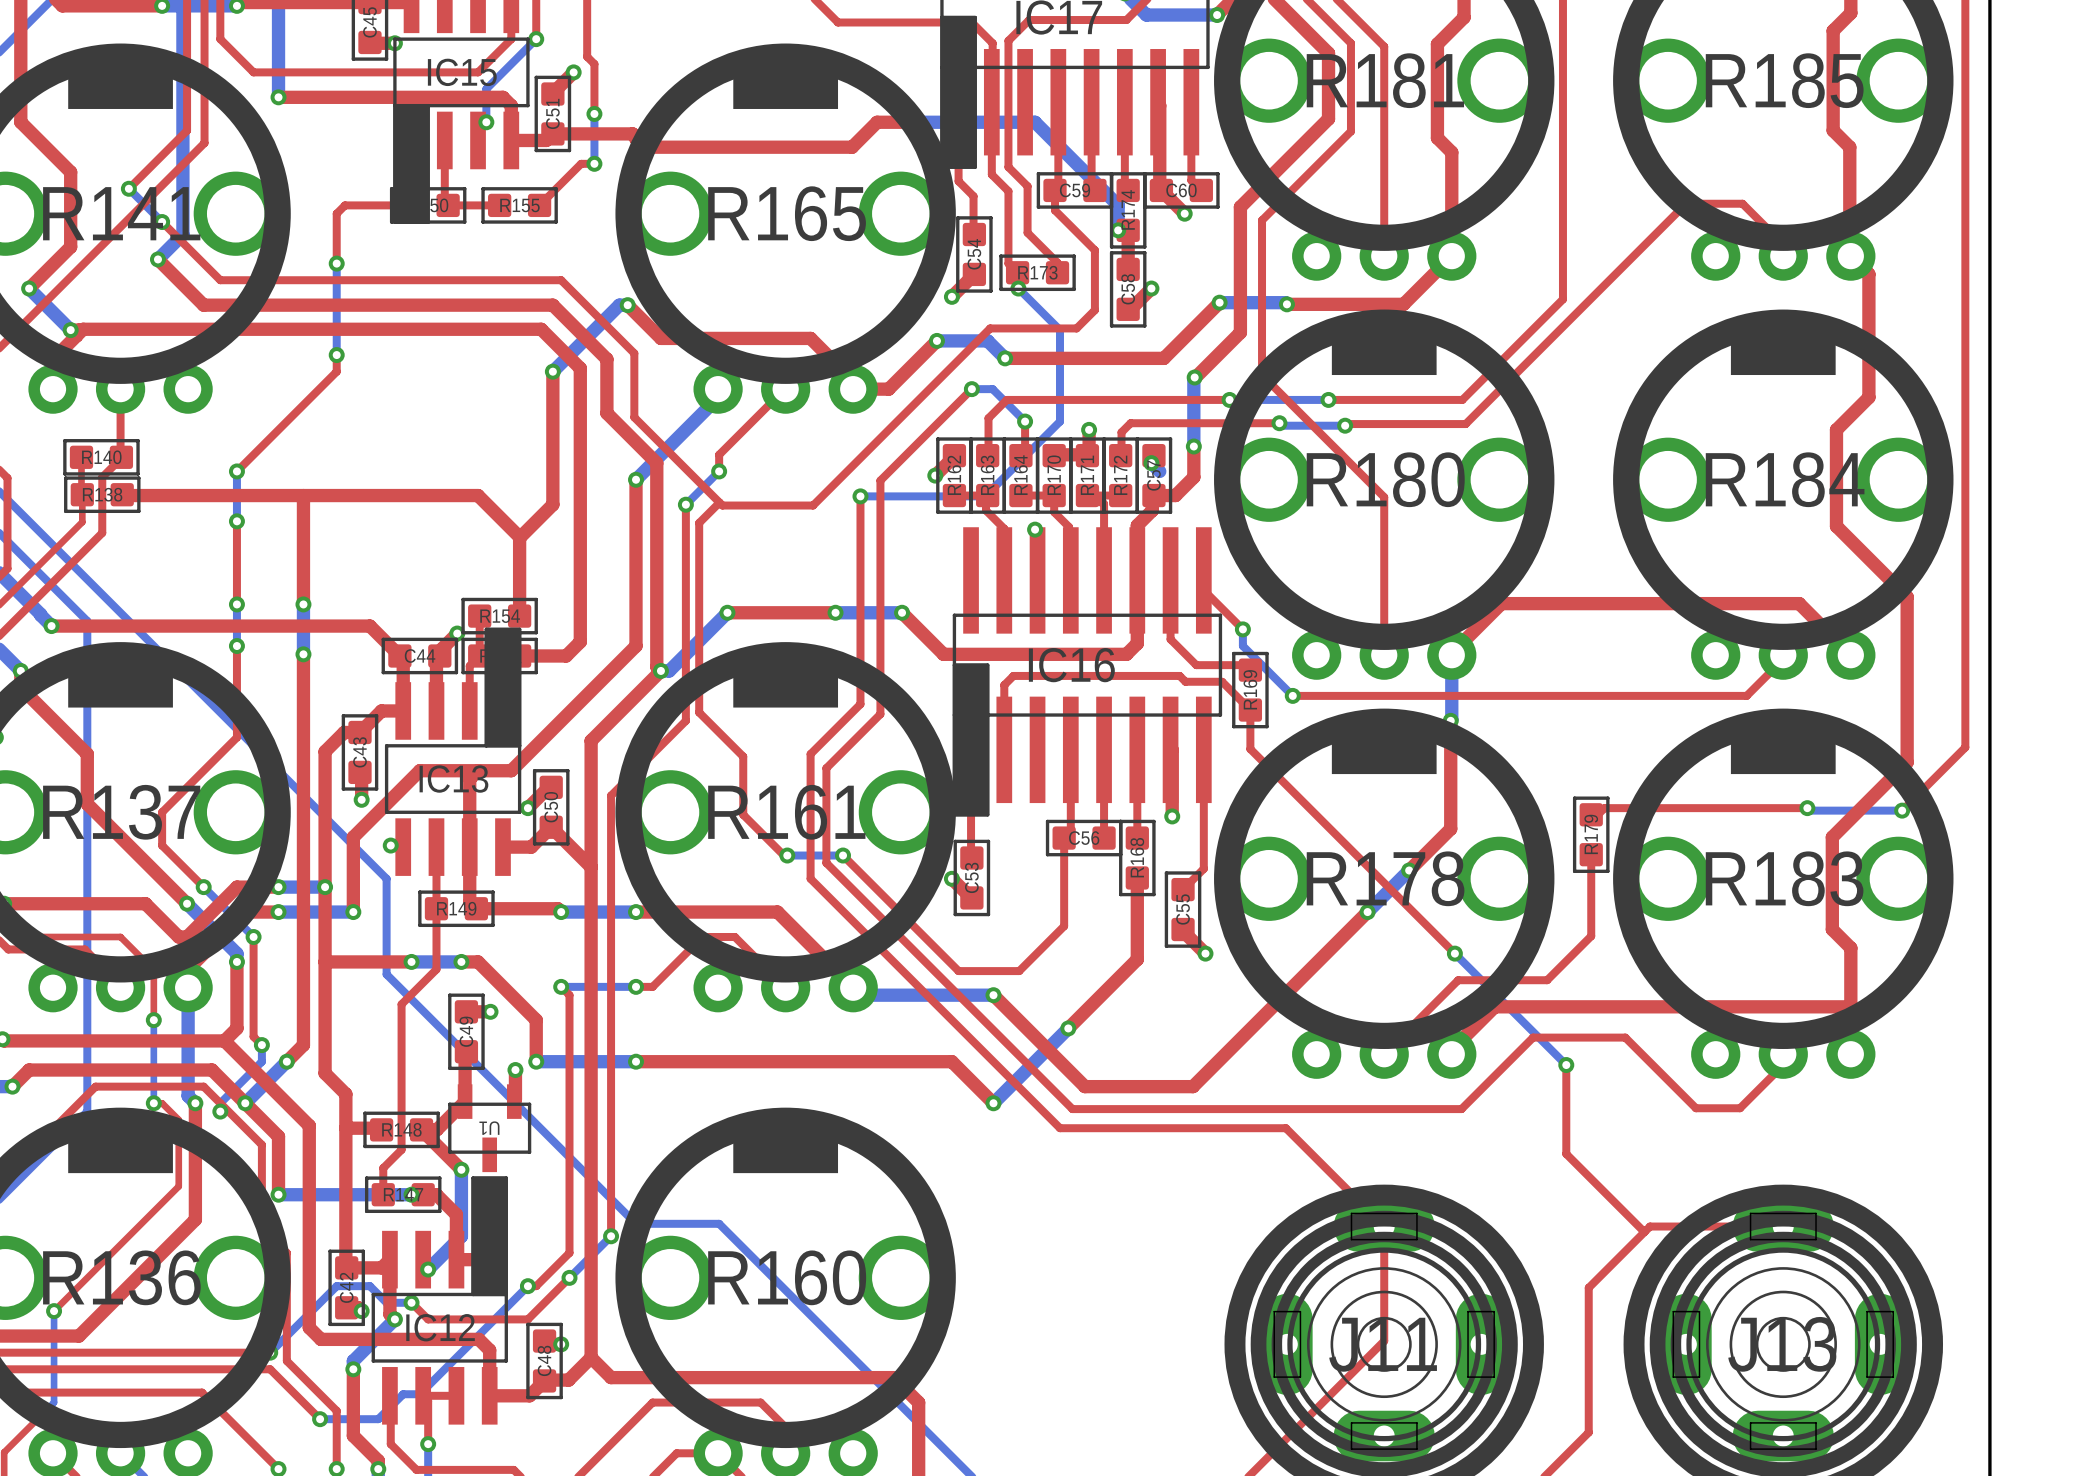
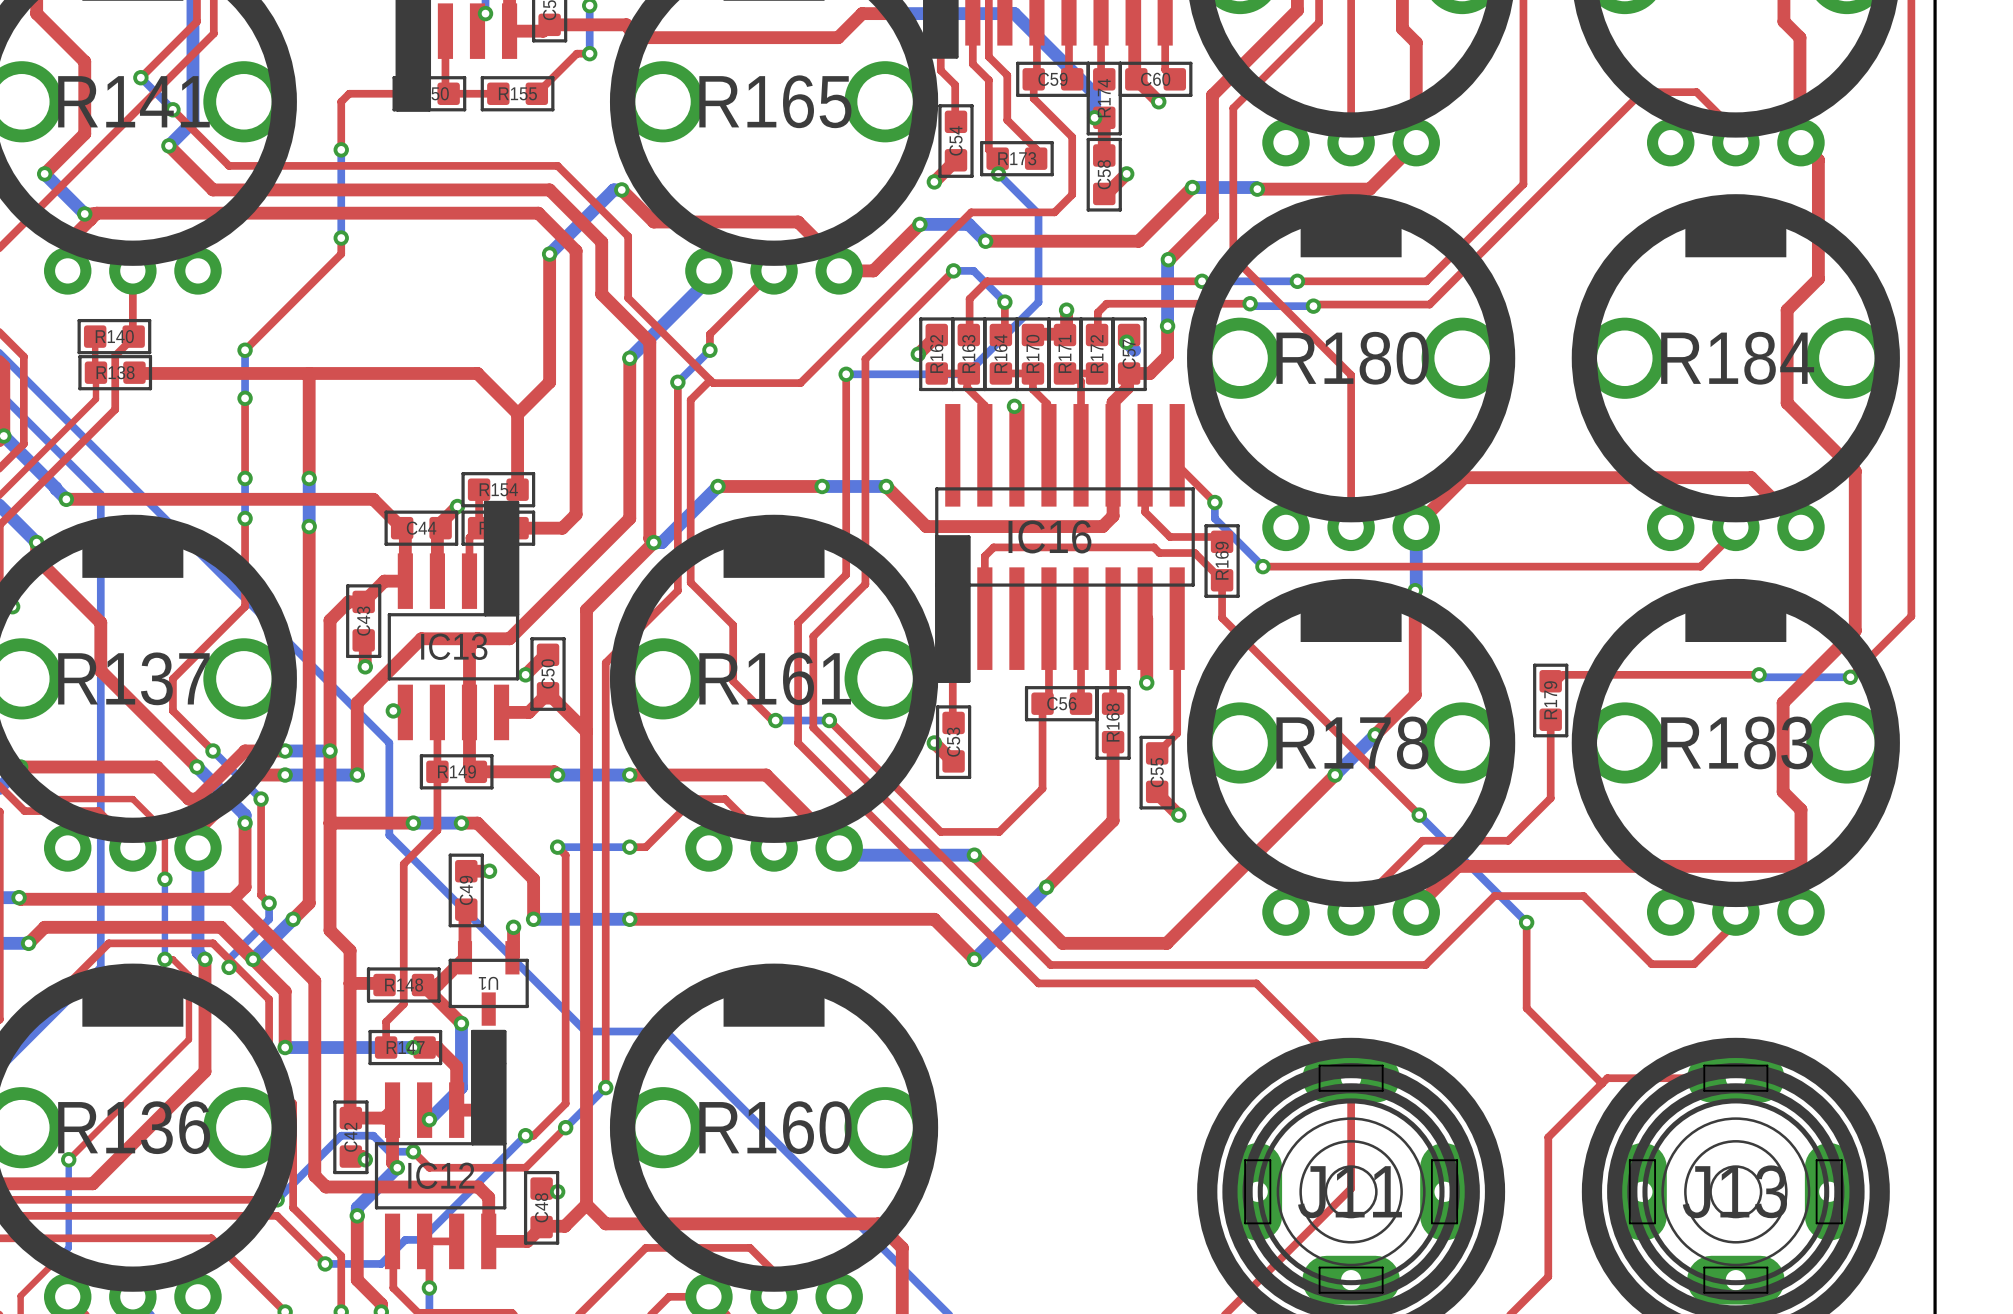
bottom track: (590, 1178) (636, 1223) (719, 1223) -> (585, 1031) (665, 1031) (709, 1075)

